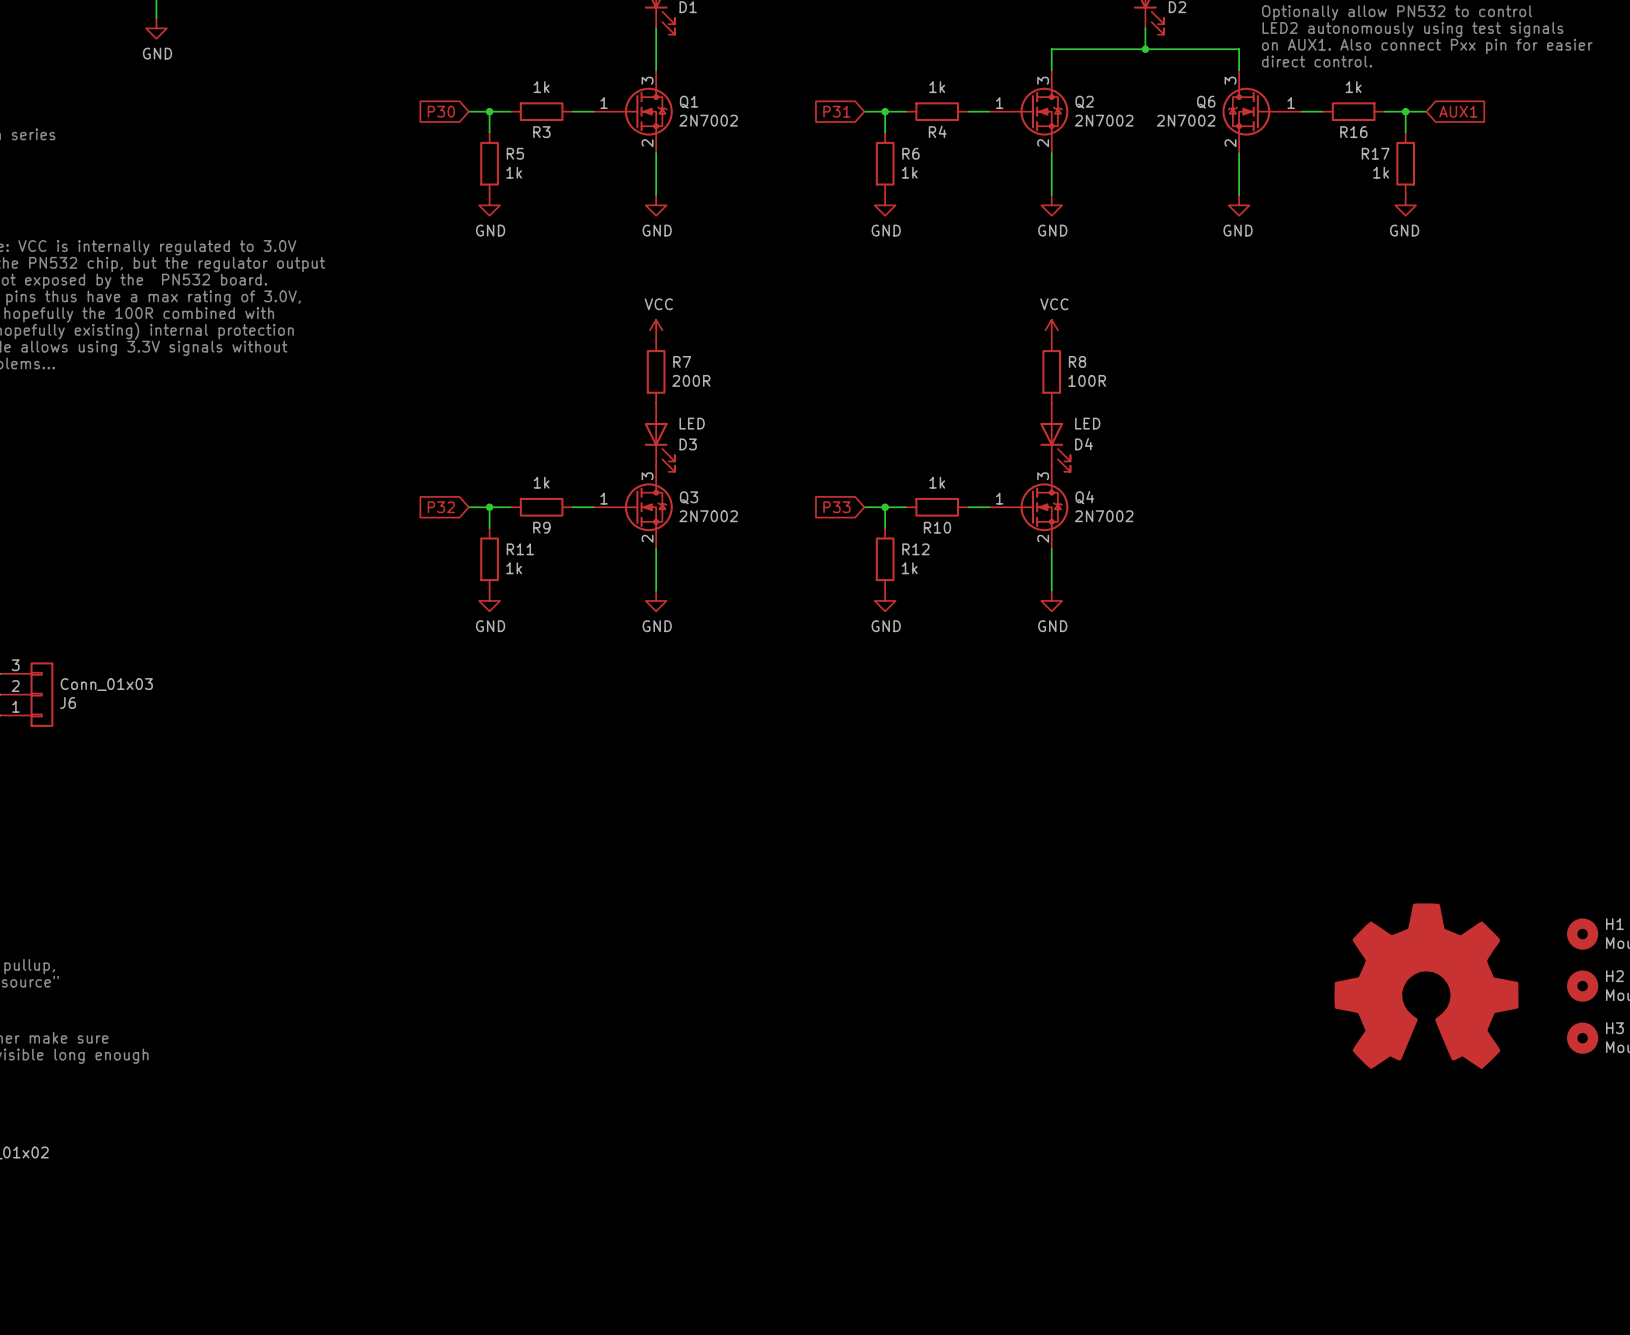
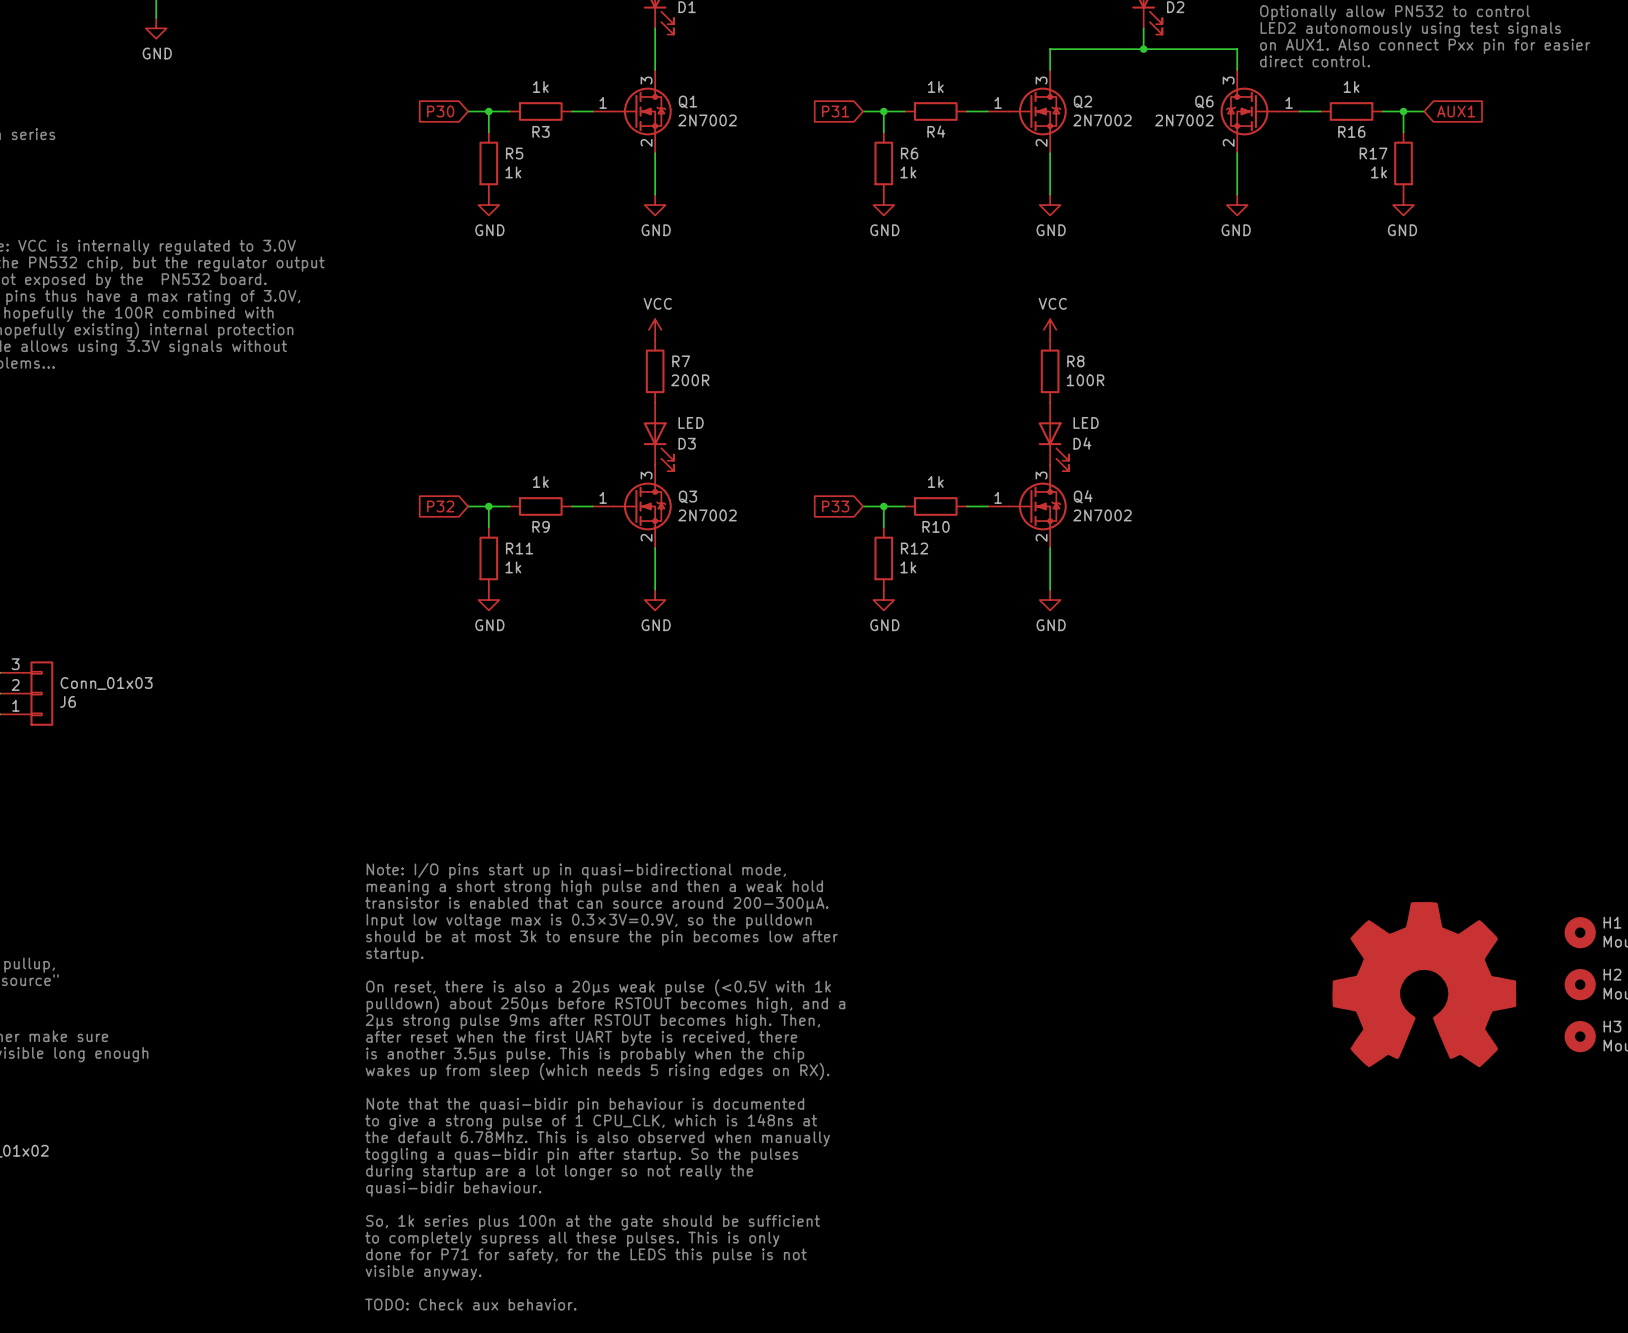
text: none -> Note: I/O pins start up in quasi-bidirectional mode, (576, 870)
text: none -> meaning a short strong high pulse and then a weak hold (594, 887)
text: none -> transistor is enabled that can source around 200-300μA. (596, 904)
text: none -> Input low voltage max is 0.3×3V=0.9V, so the pulldown (589, 921)
text: none -> should be at most 3k to ensure the pin becomes low after (602, 938)
text: none -> startup. (394, 954)
text: none -> On reset, there is also a 20μs weak pulse (<0.5V with 1k (598, 987)
text: none -> pulldown) about 250μs before RSTOUT becomes high, and a (605, 1004)
text: none -> 2μs strong pulse 9ms after RSTOUT becomes high. Then, (592, 1021)
text: none -> after reset when the first UART byte is received, there (581, 1038)
text: none -> is another 3.5μs pulse. This is probably when the chip (585, 1055)
text: none -> wakes up from sleep (which needs 5 rising edges on RX). (597, 1071)
text: none -> Note that the quasi-bidir pin behaviour is documented (585, 1105)
text: none -> to give a strong pulse of 1 CPU_CLK, which is 148ns at (591, 1121)
text: none -> the default 6.78Mhz. This is also observed when manually (597, 1138)
text: none -> toggling a quas-bidir pin after startup. So the pulses (581, 1155)
text: none -> during startup are a lot longer so not really the (559, 1172)
text: none -> quasi-bidir behaviour. (453, 1189)
text: none -> So, 1k series plus 100n at the gate should be sufficient (593, 1222)
text: none -> to completely supress all these pulses. This is only (572, 1239)
text: none -> done for P71 for safety, for the LEDS this pulse is not (586, 1256)
text: none -> visible anyway. (423, 1272)
text: none -> TODO: Check aux behavior. (470, 1304)

